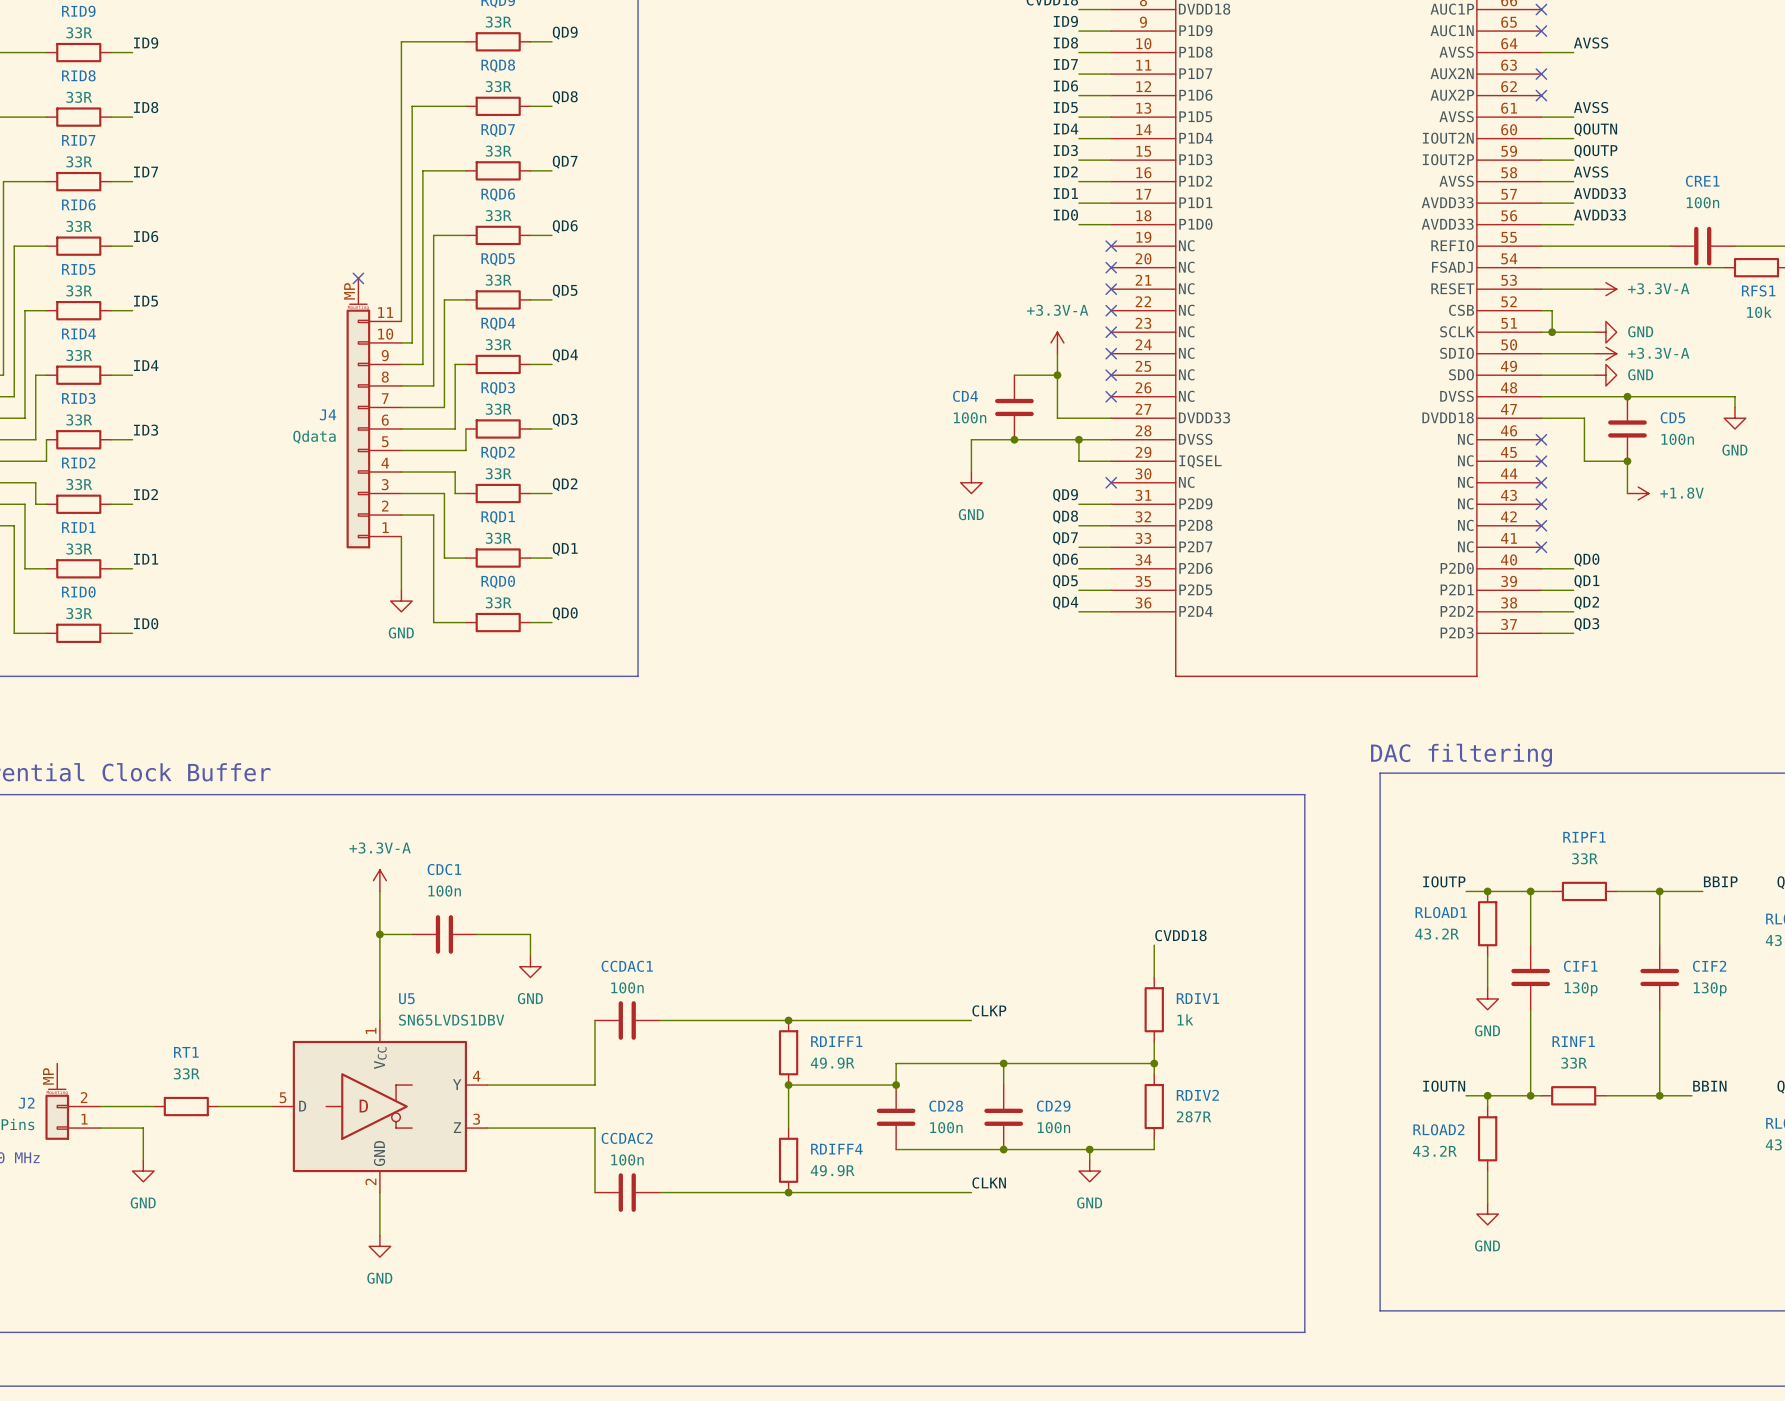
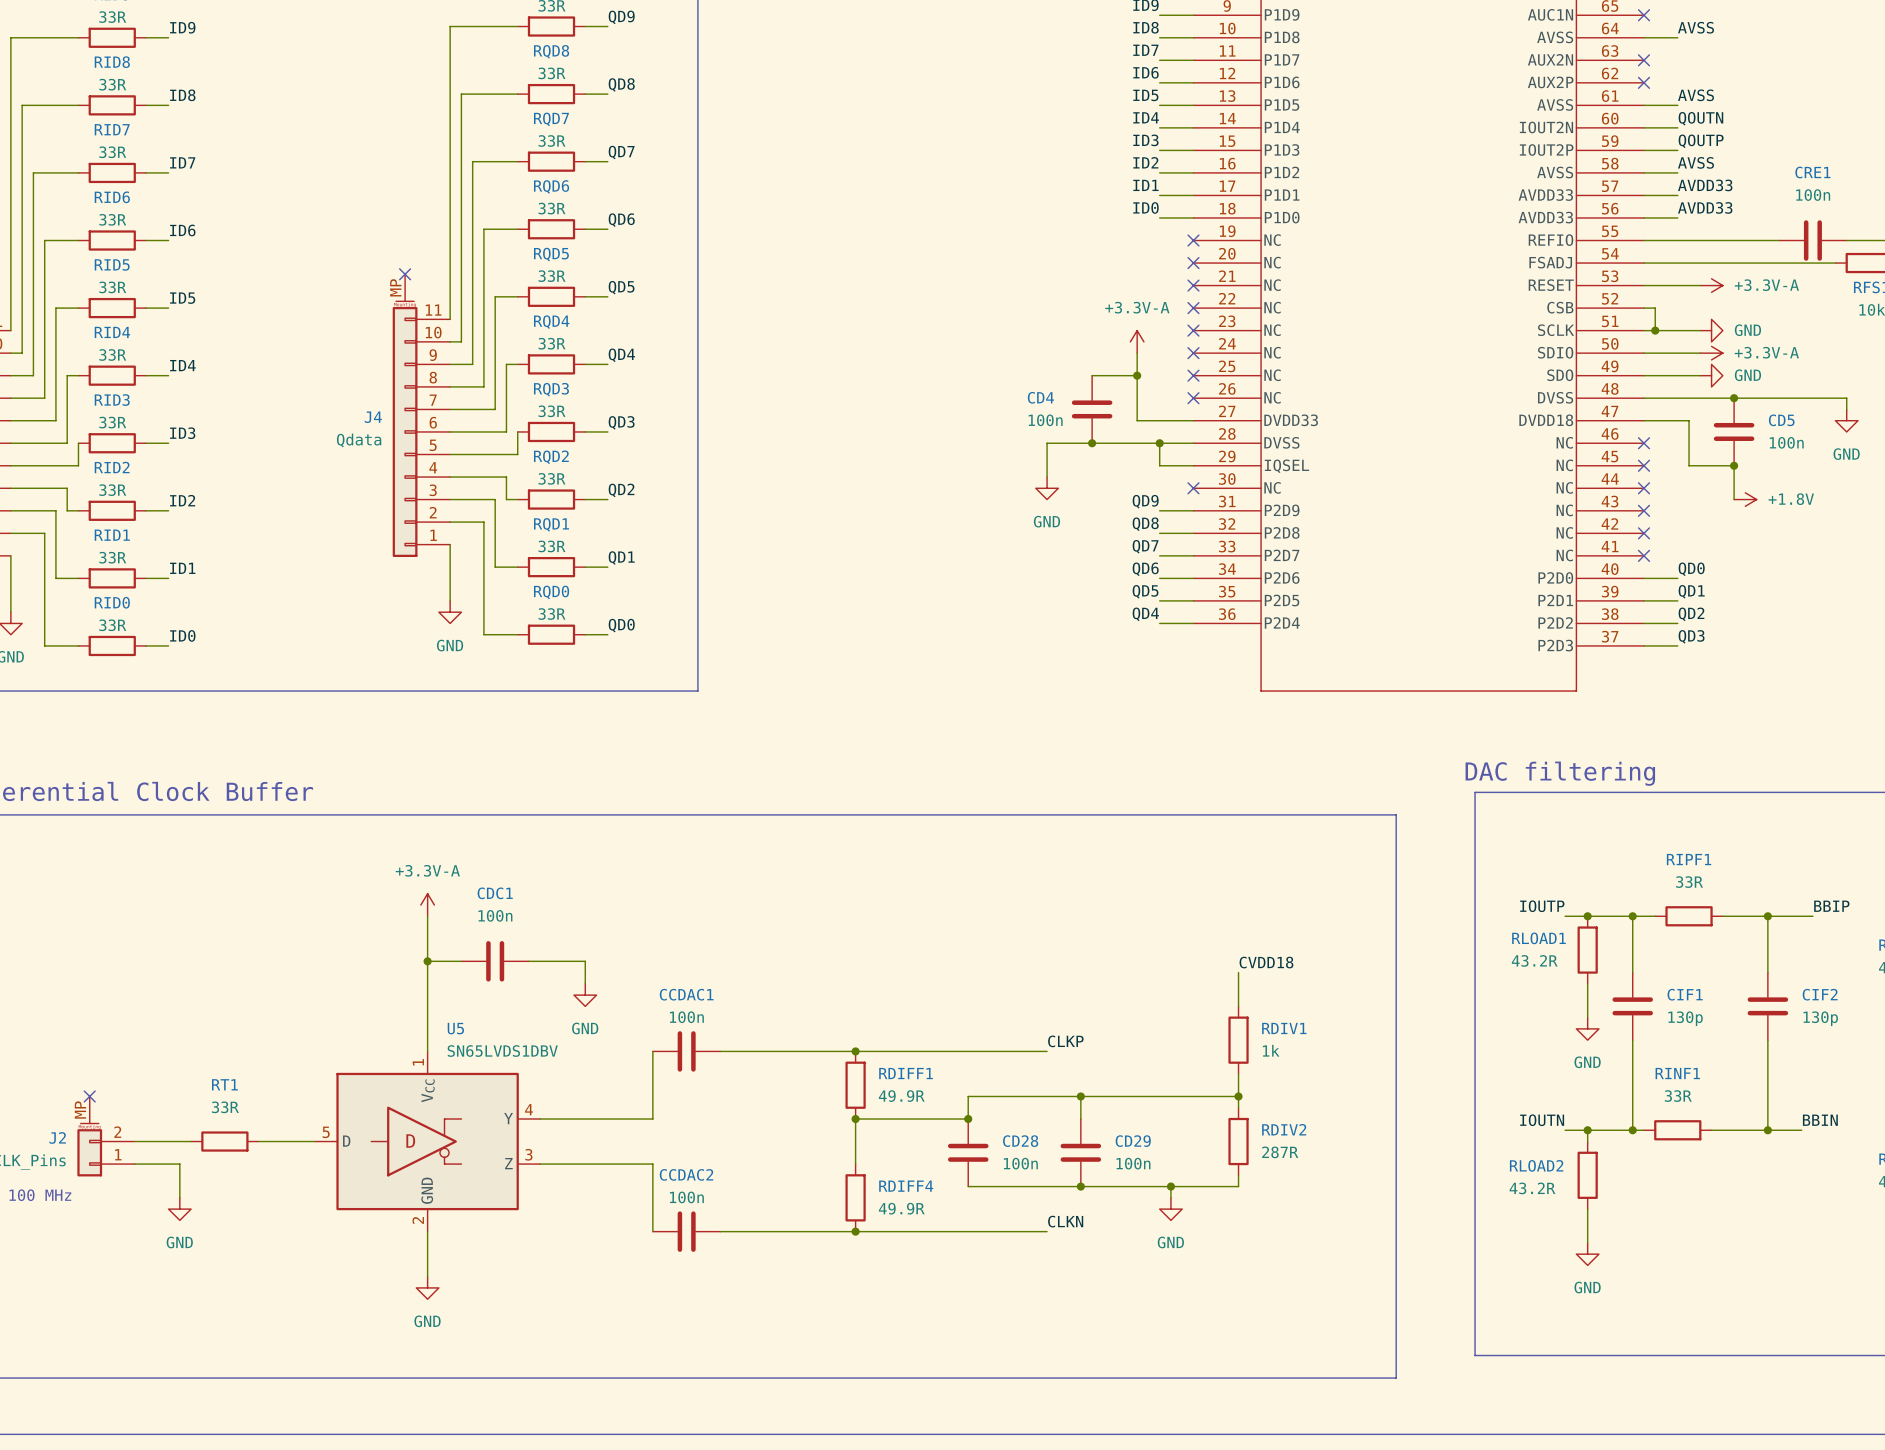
no-connect mark: none -> (89, 1096)

